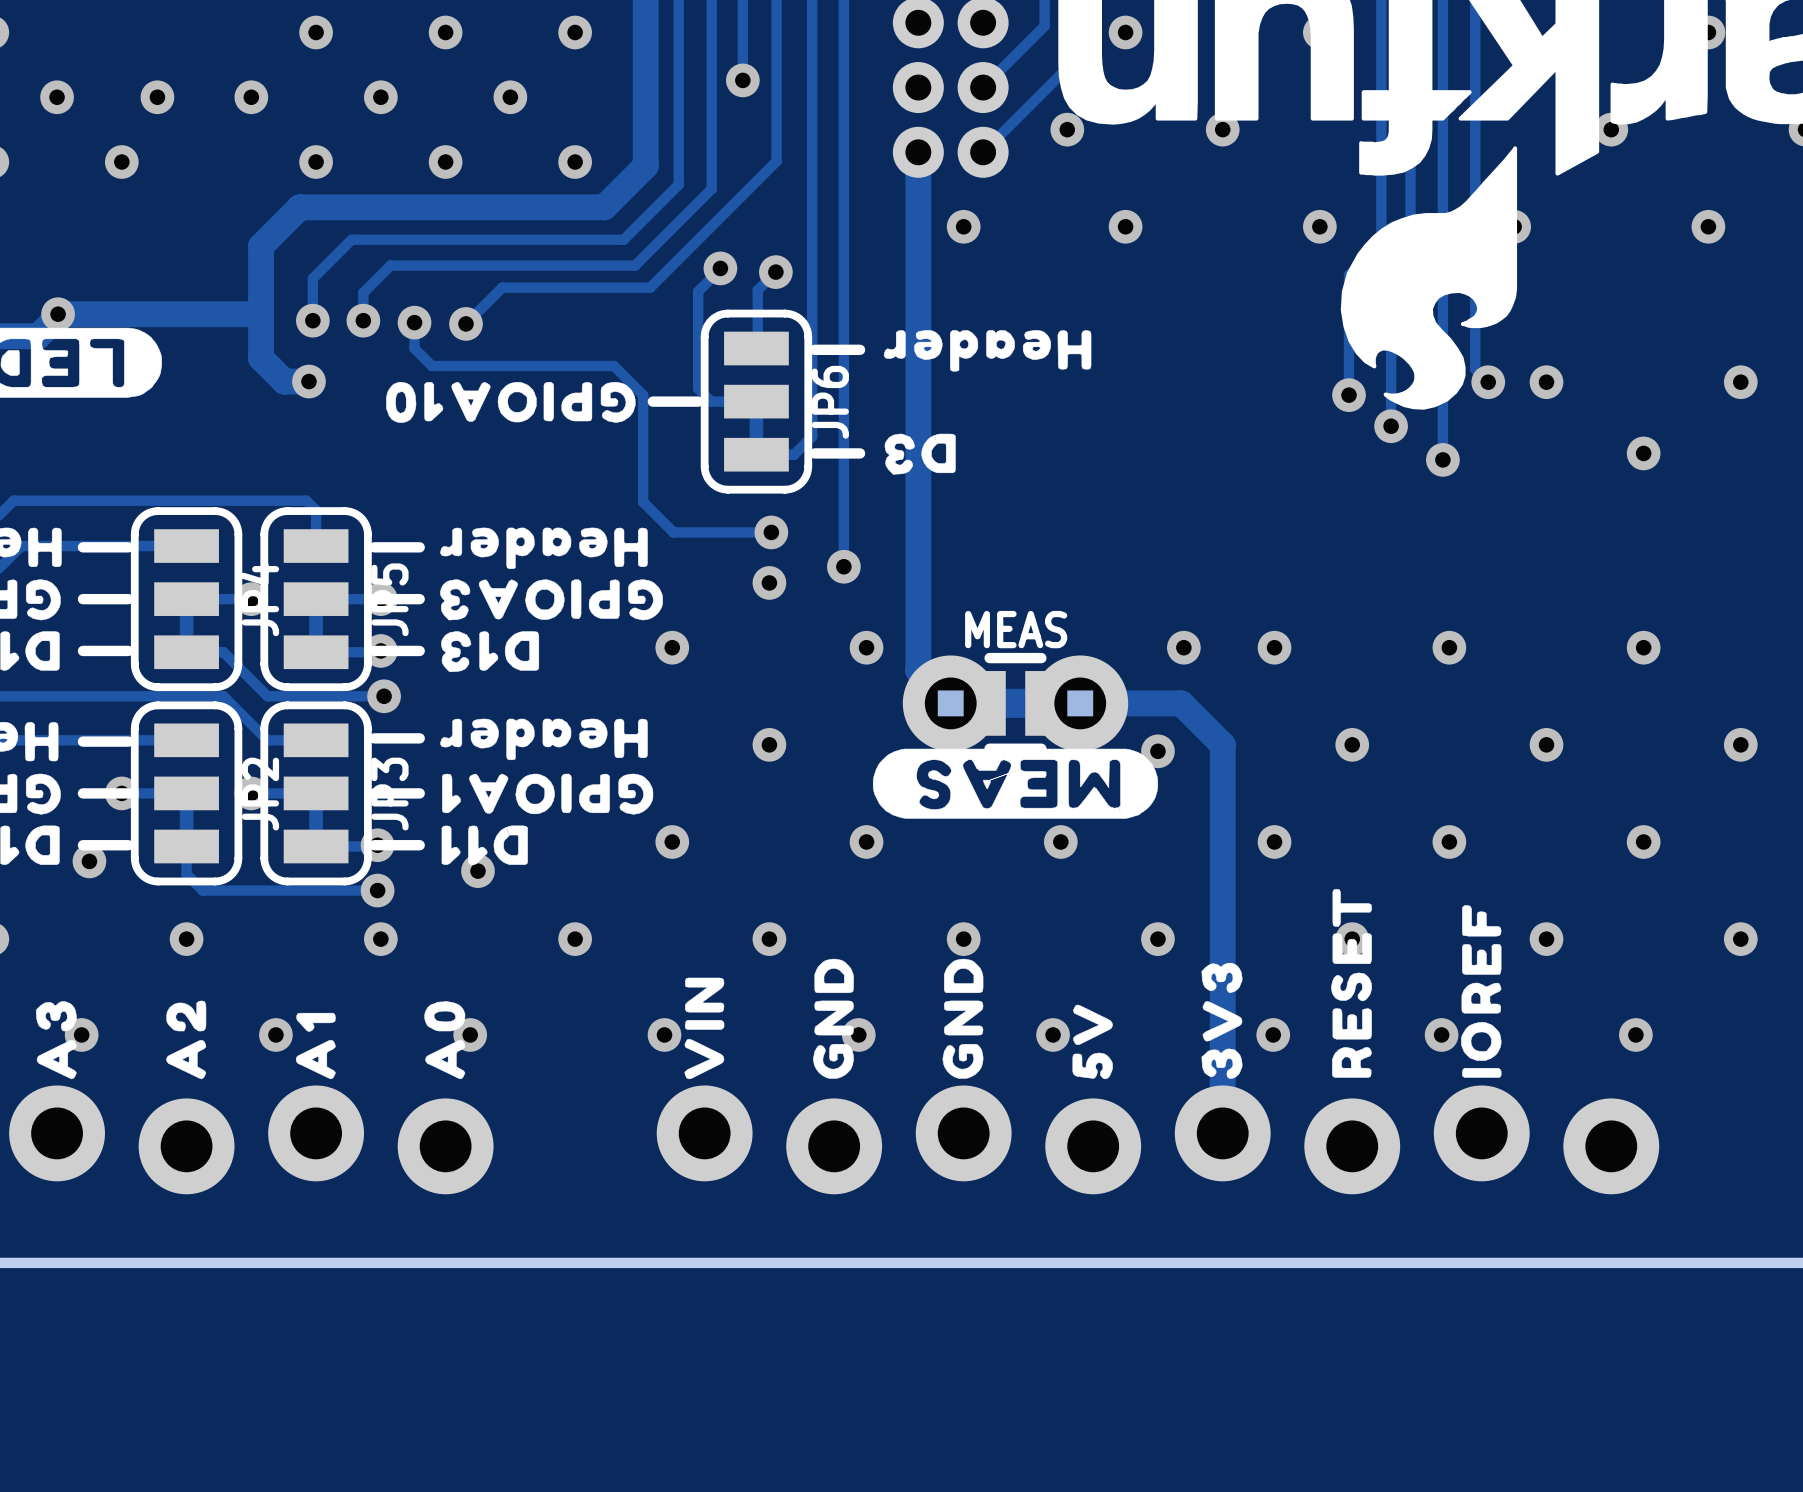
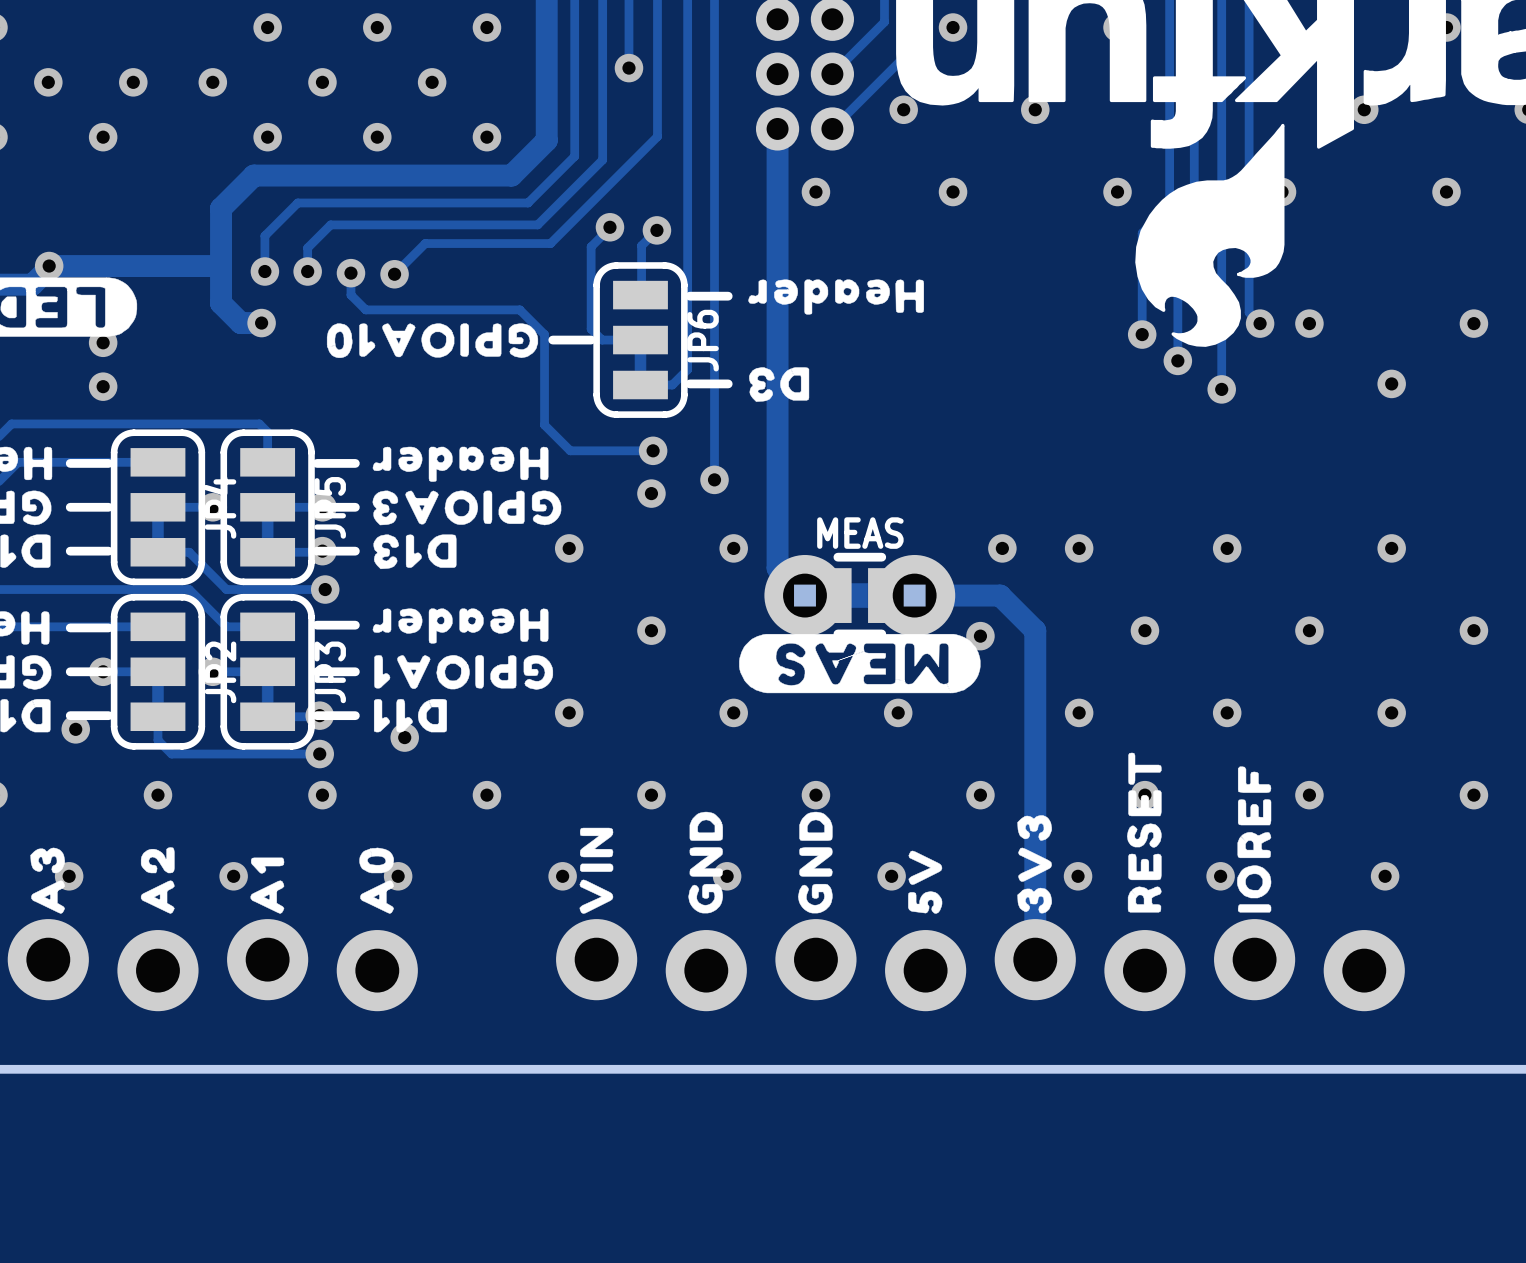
via: none -> (103, 342)
via: none -> (103, 386)

